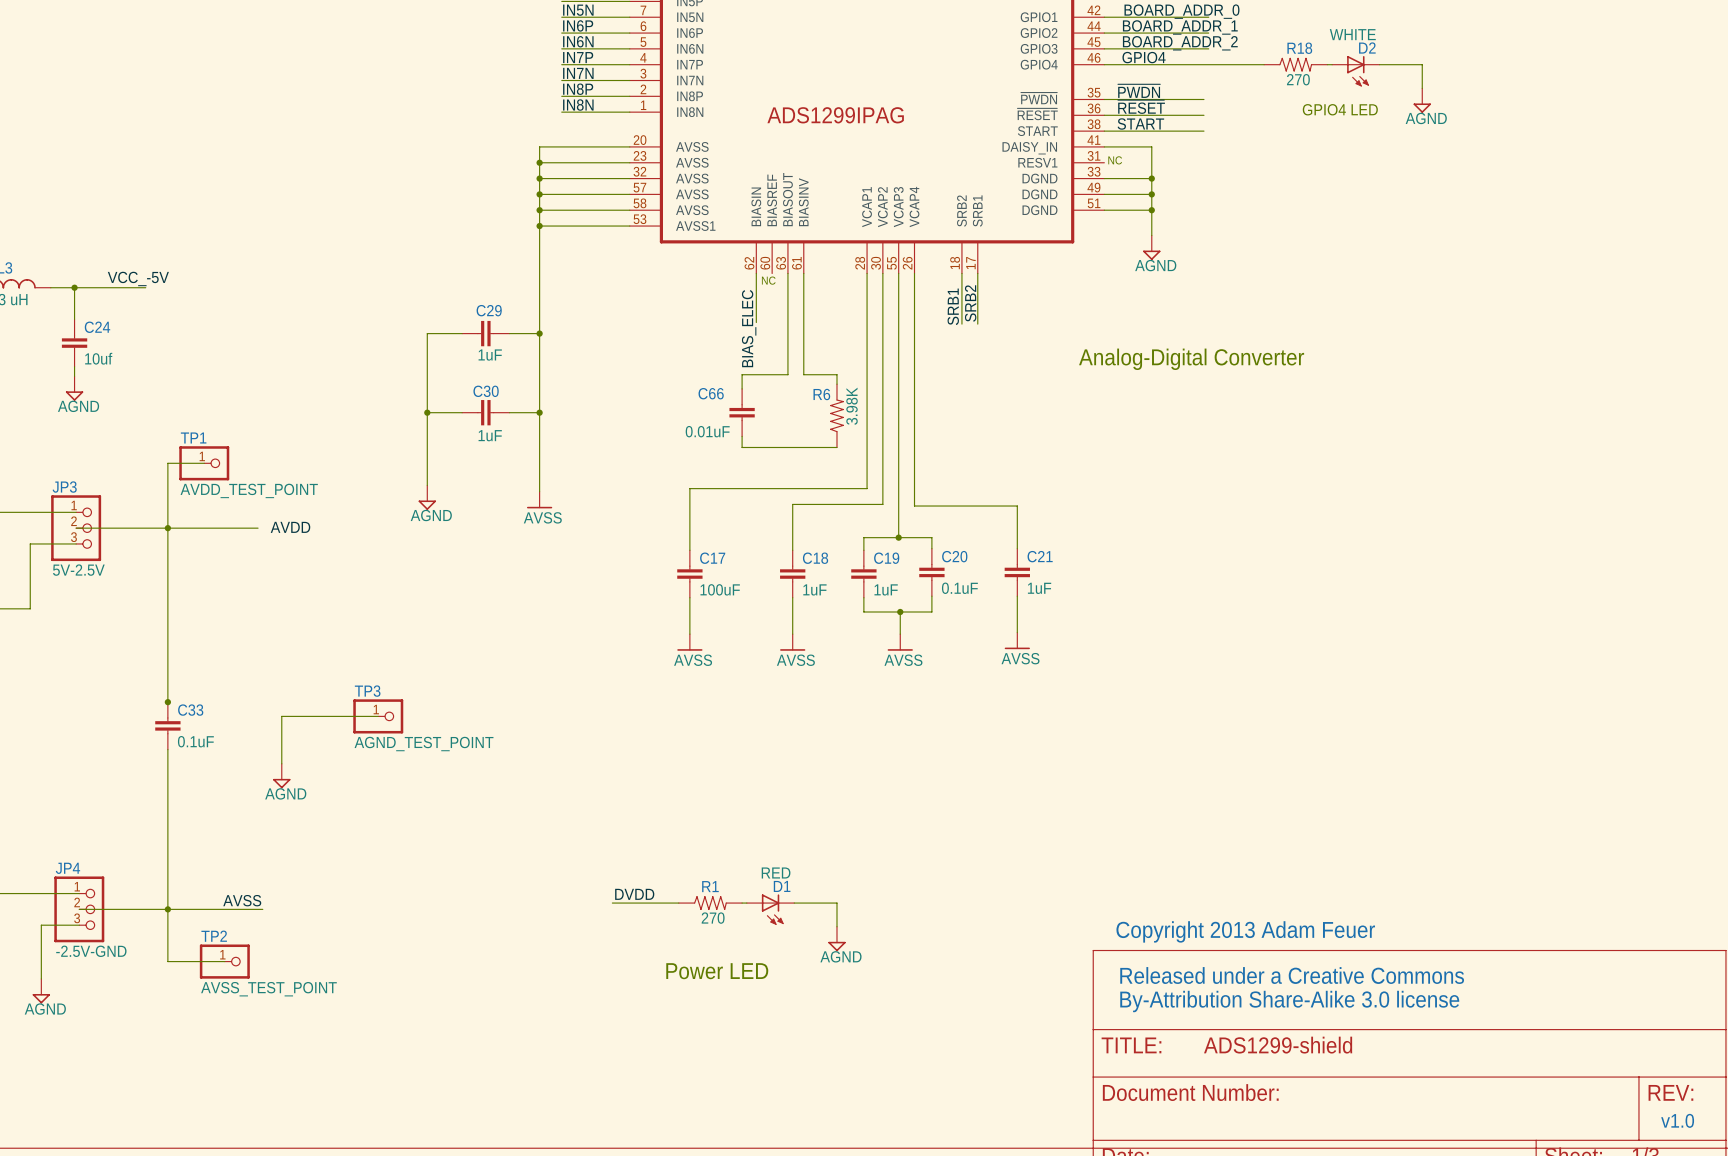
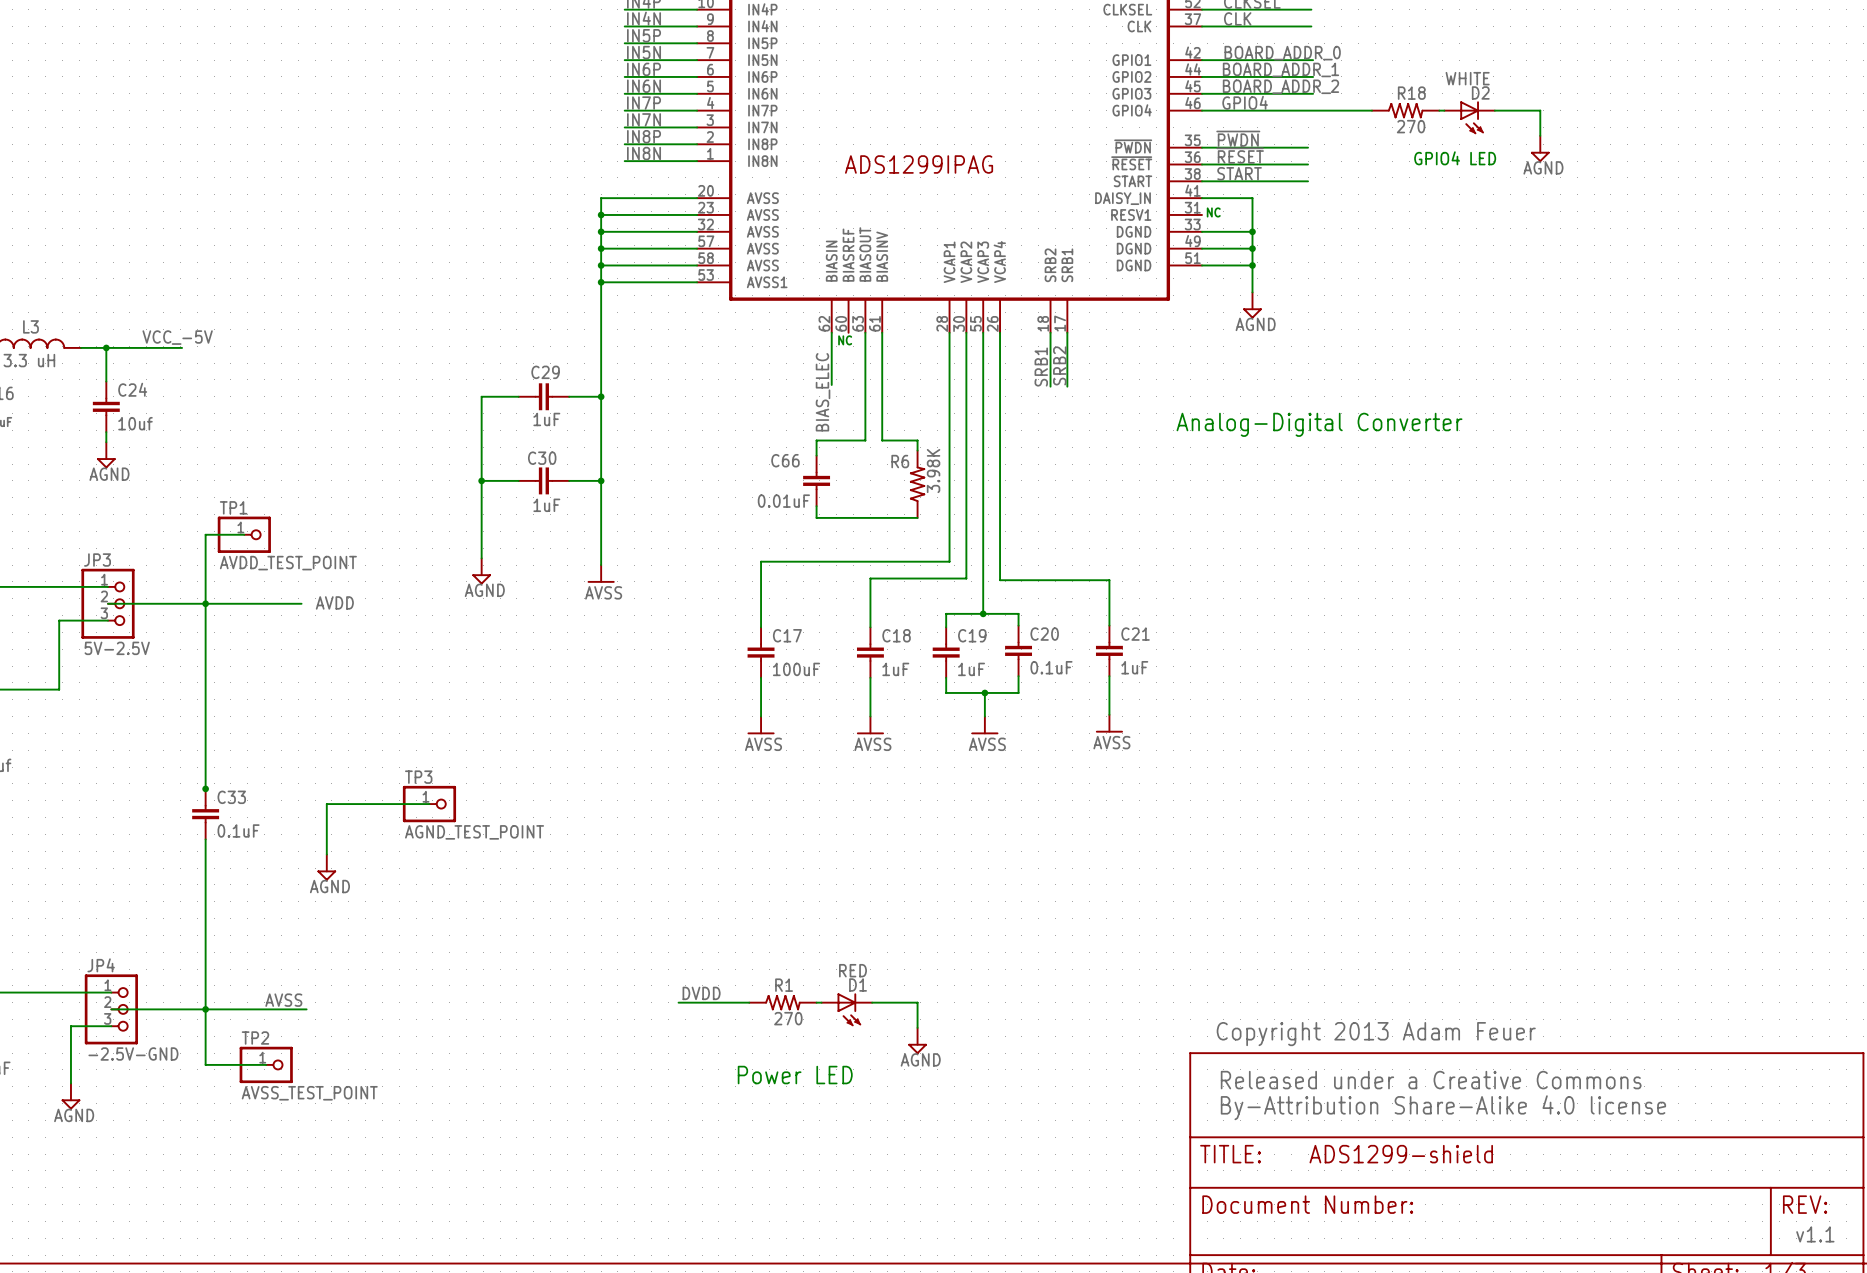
text: By-Attribution Share-Alike 3.0 license (1289, 1001) -> By-Attribution Share-Alike 4.0 license (1443, 1107)
text: v1.0 (1677, 1120) -> v1.1 (1815, 1234)

